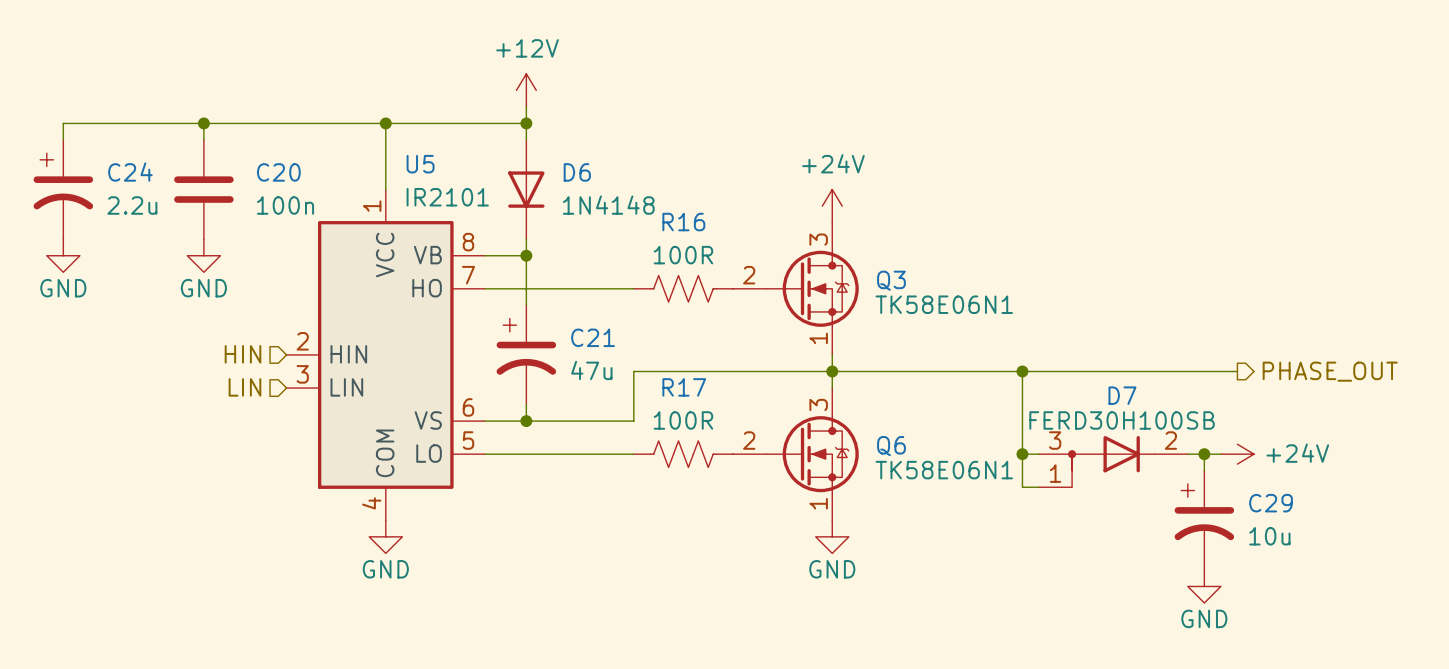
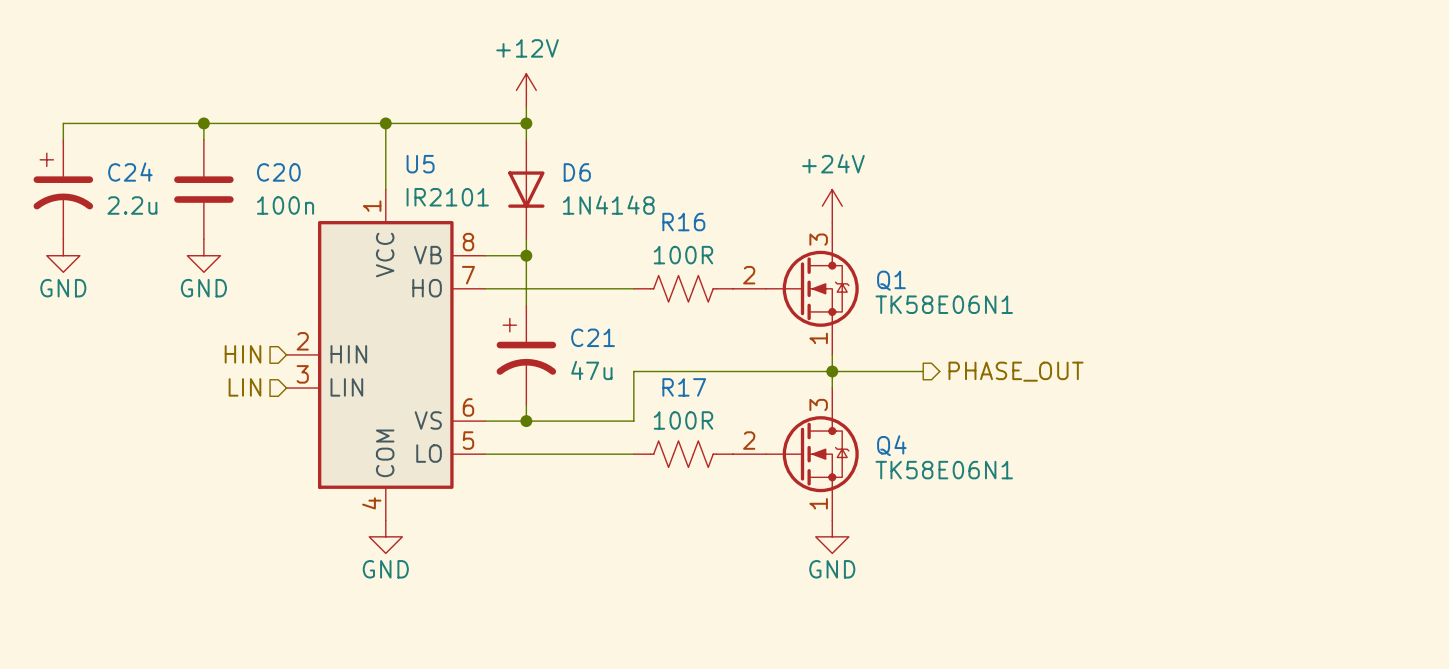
Q3 name: Q3 (891, 280) -> Q1 (891, 280)
wire: (923, 371) (1237, 371) -> none
wire: (1022, 371) (1022, 487) (1038, 487) -> none
junction: (1022, 371) -> none
hierarchical label position: PHASE_OUT (1330, 371) -> PHASE_OUT (1016, 371)
Q6 name: Q6 (891, 446) -> Q4 (891, 445)
wire: (1022, 454) (1038, 454) -> none
junction: (1022, 454) -> none
wire: (1187, 454) (1220, 454) -> none
wire: (1204, 454) (1204, 470) -> none
junction: (1204, 454) -> none
power symbol: +24V (1237, 454) -> none
D7: FERD30H100SB (1113, 461) -> none
C29: 10u (1204, 520) -> none
power symbol: GND (1204, 586) -> none

